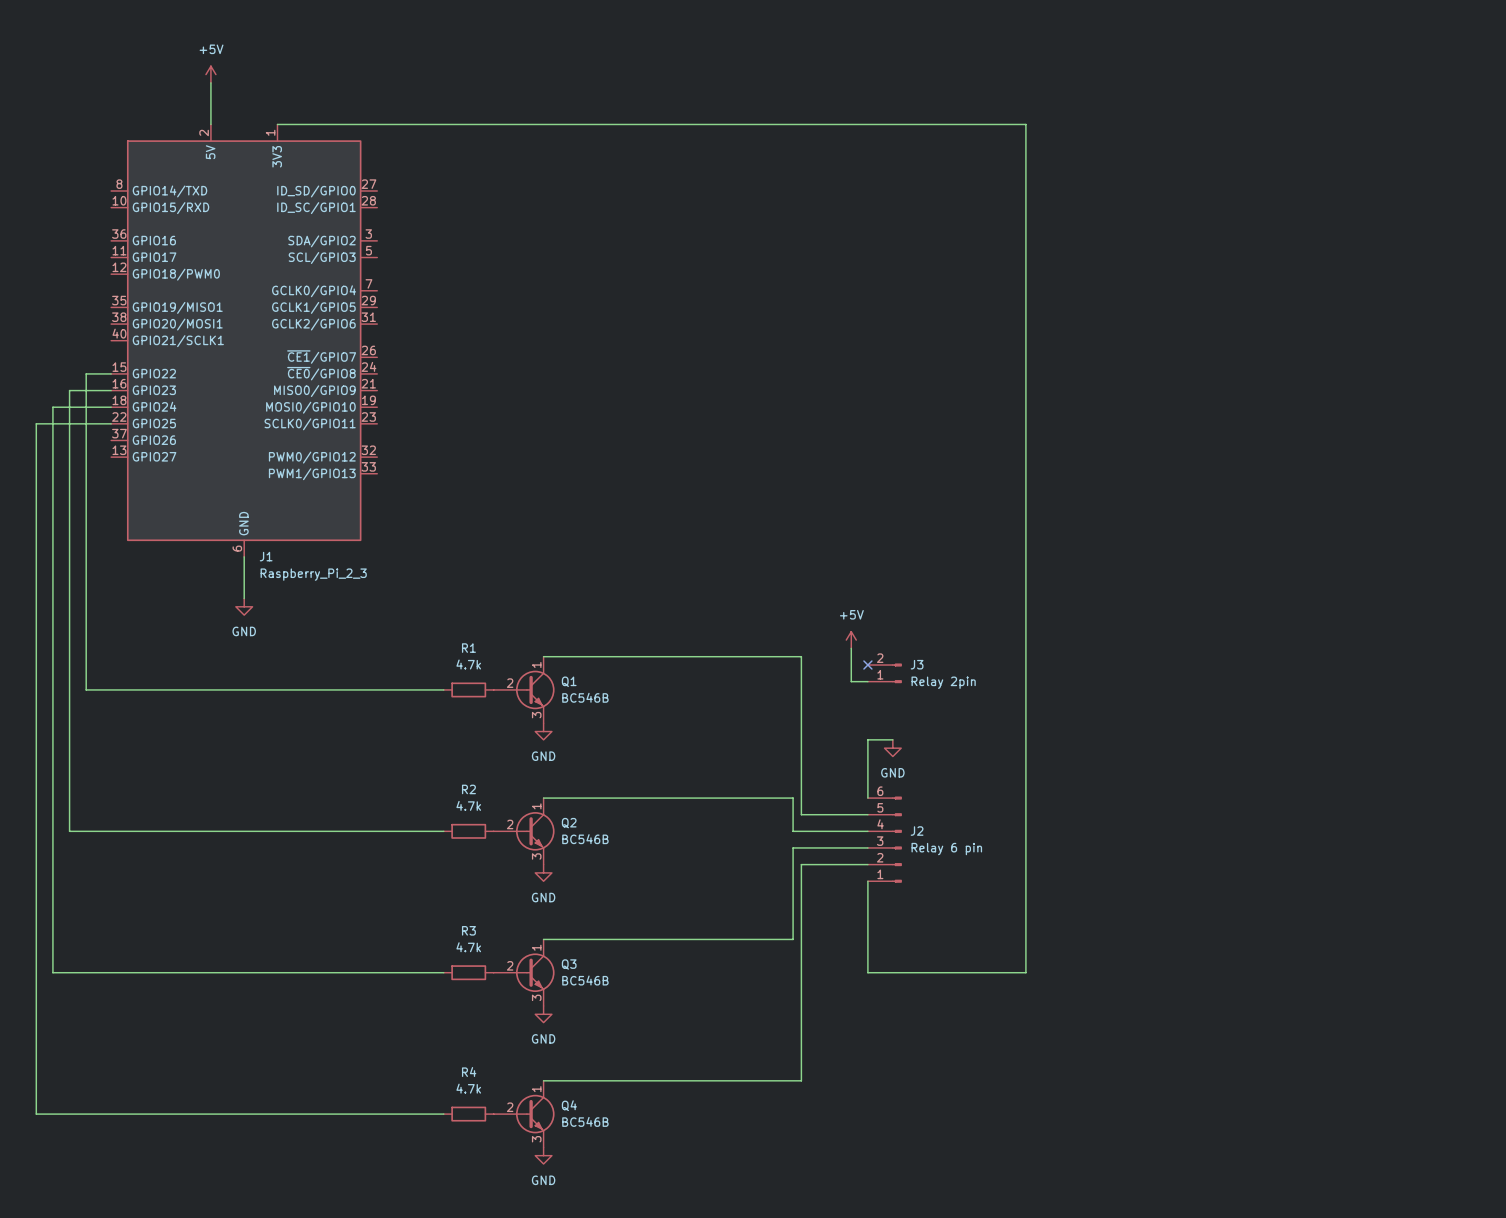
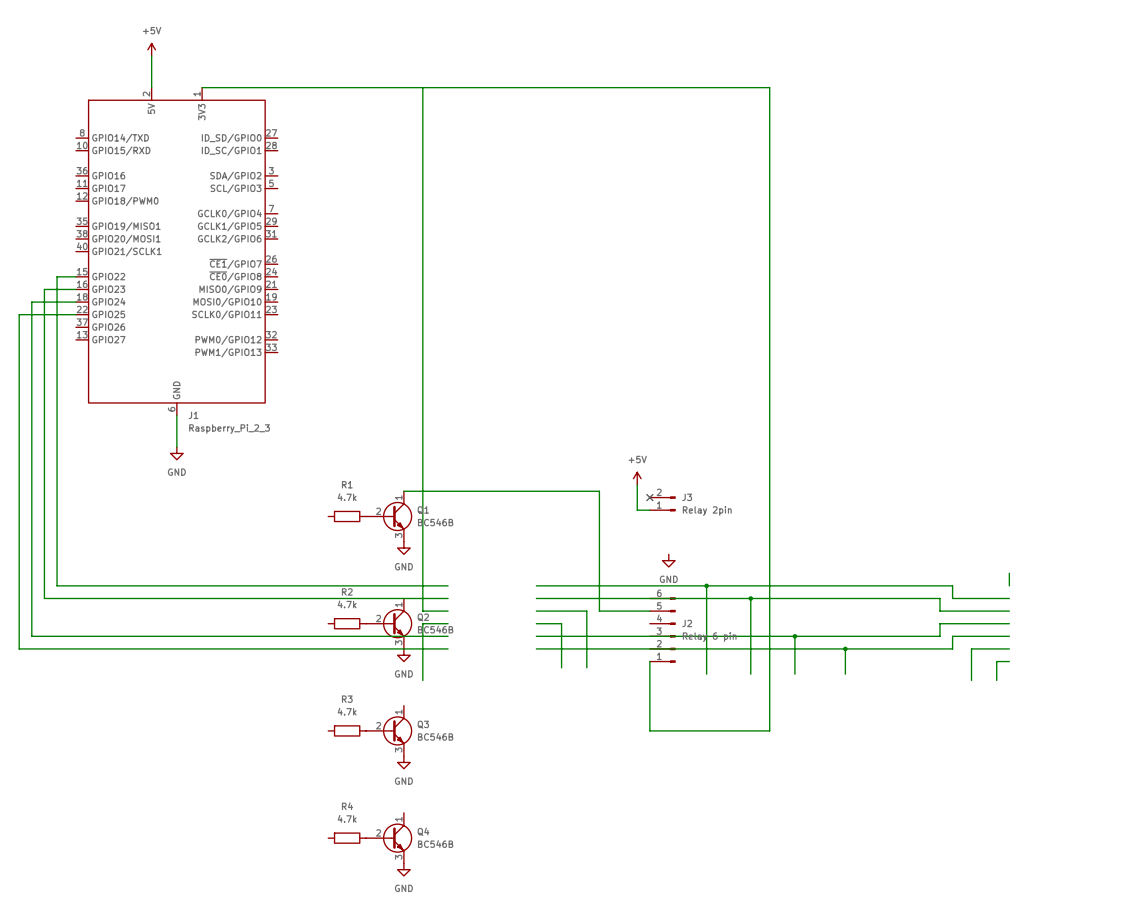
wire: none -> (422, 87) (422, 611) (448, 611)
wire: (86, 689) (443, 689) -> (57, 516) (57, 585) (448, 585)
wire: (892, 739) (867, 739) (867, 798) -> none
wire: none -> (1009, 573) (1009, 585)
wire: none -> (536, 585) (952, 585) (952, 598) (1009, 598)
wire: none -> (706, 585) (706, 674)
junction: none -> (706, 585)
wire: (69, 798) (69, 831) (443, 831) -> (44, 598) (403, 598)
wire: (601, 798) (718, 798) -> none
wire: (793, 798) (793, 831) (867, 831) -> (593, 598) (939, 598) (939, 611) (1009, 611)
wire: none -> (750, 598) (750, 674)
junction: none -> (750, 598)
wire: none -> (536, 611) (586, 611) (586, 667)
wire: none -> (448, 623) (422, 623) (422, 680)
wire: none -> (536, 623) (561, 623) (561, 667)
wire: none -> (1009, 623) (939, 623) (939, 636) (649, 636)
wire: (52, 847) (52, 972) (443, 972) -> (31, 636) (448, 636)
wire: (793, 847) (793, 939) (543, 939) -> (593, 636) (536, 636)
wire: none -> (794, 636) (794, 674)
junction: none -> (794, 636)
wire: none -> (1009, 636) (952, 636) (952, 648) (649, 648)
wire: (36, 864) (36, 1114) (443, 1114) -> (19, 648) (448, 648)
wire: (801, 864) (801, 1080) (543, 1080) -> (599, 648) (536, 648)
wire: none -> (845, 648) (845, 674)
junction: none -> (845, 648)
wire: none -> (1009, 648) (971, 648) (971, 680)
wire: none -> (1009, 661) (996, 661) (996, 680)

